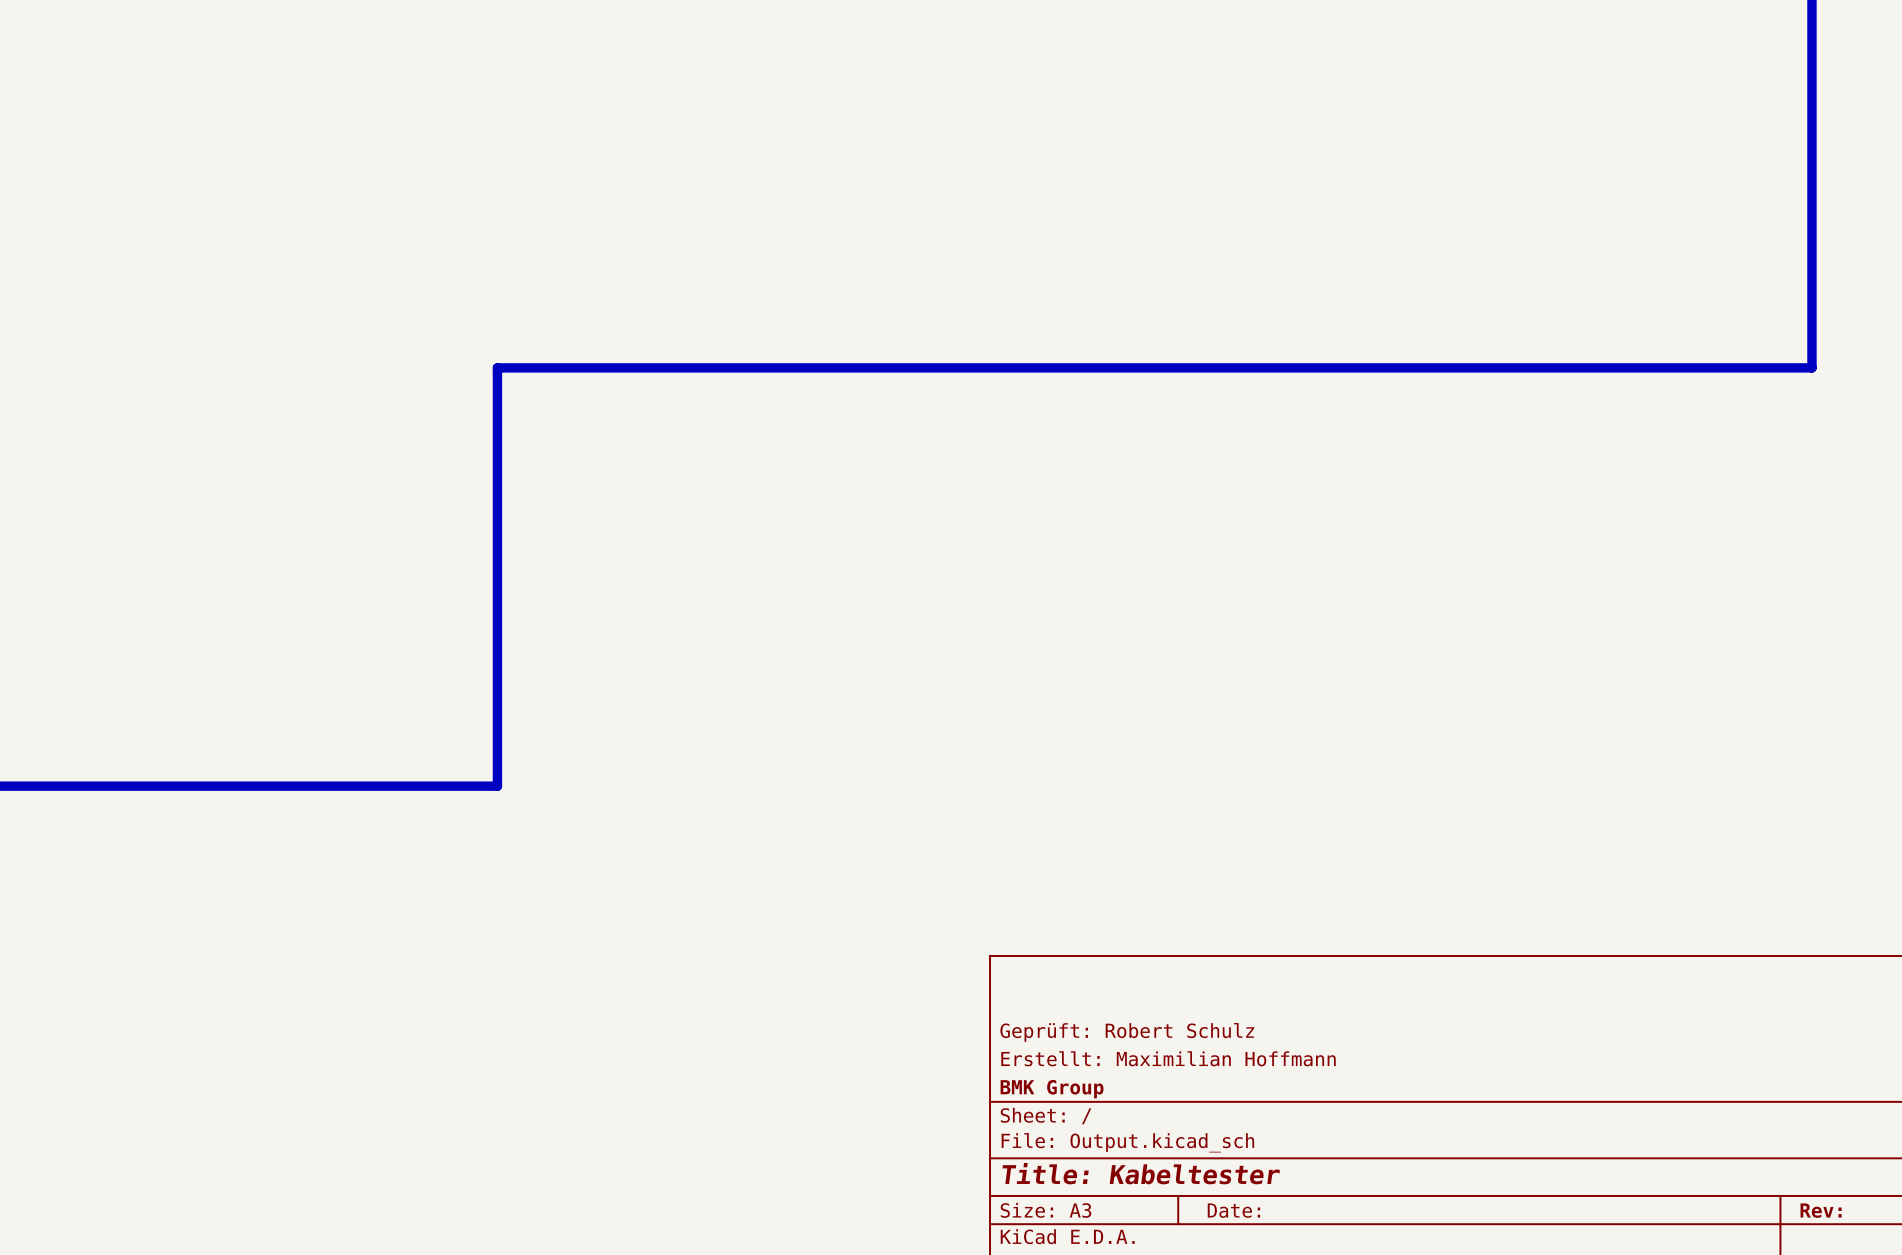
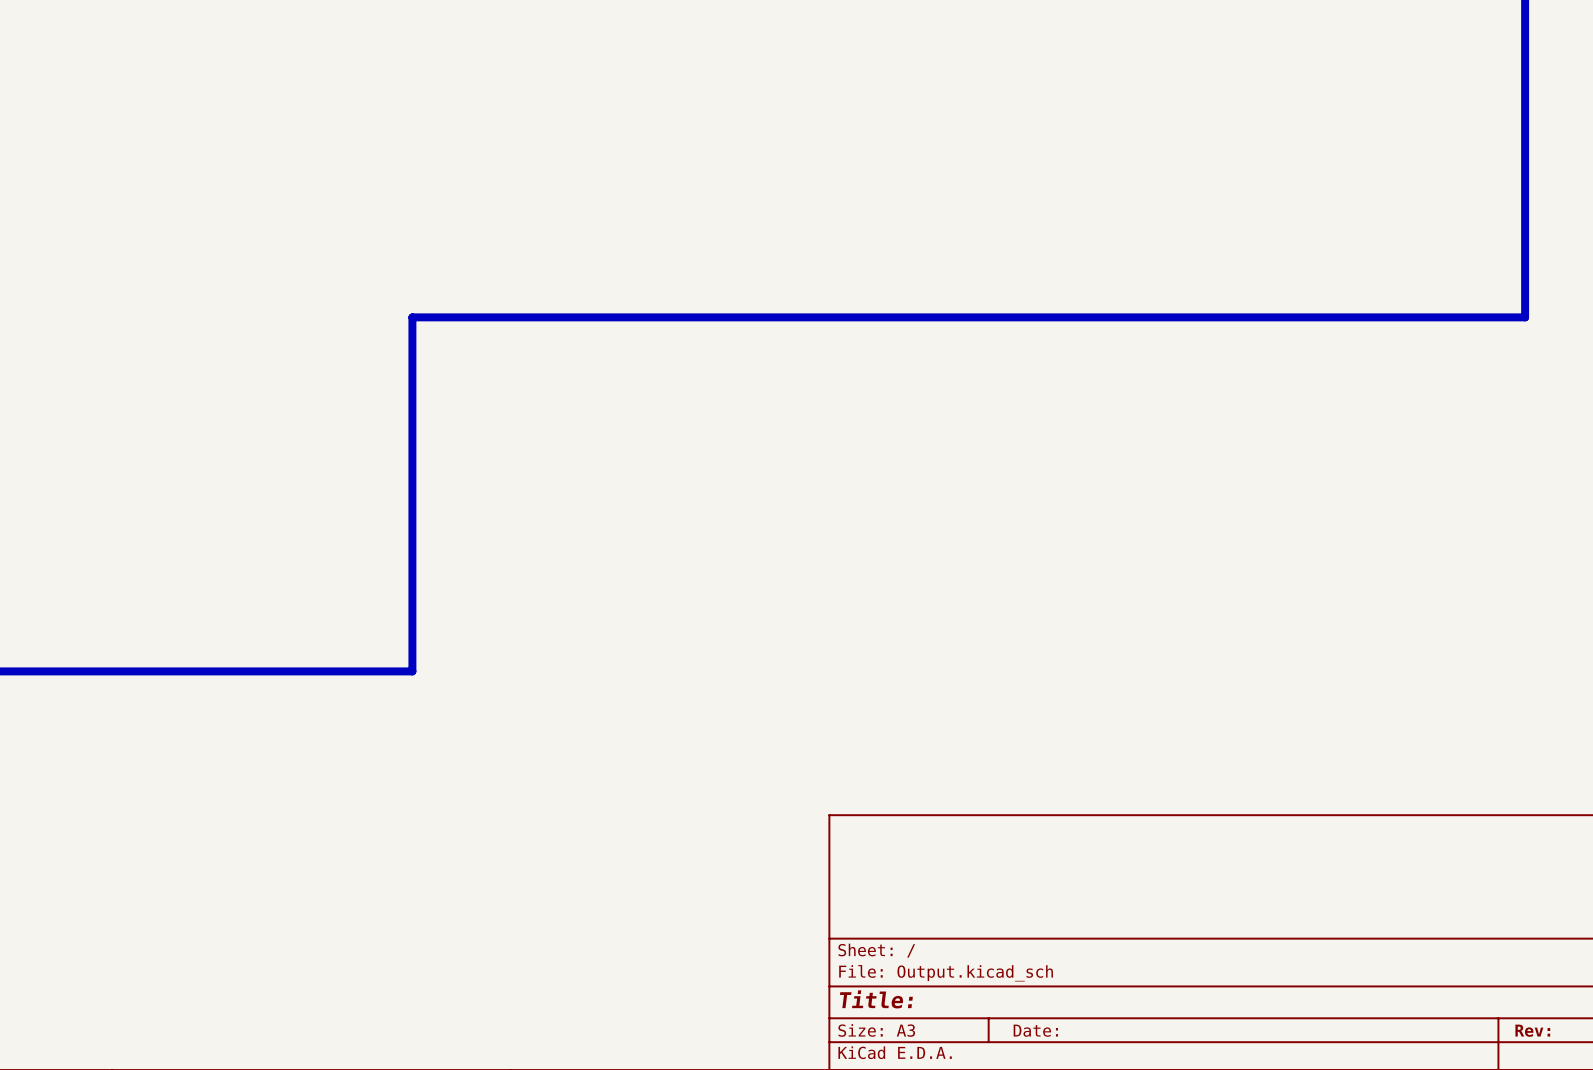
title block: Geprüft: Robert Schulz (1127, 1032) -> none
title block: Erstellt: Maximilian Hoffmann (1168, 1058) -> none
title block: BMK Group (1052, 1089) -> none
title block: Title: Kabeltester (1141, 1173) -> Title: (876, 999)

